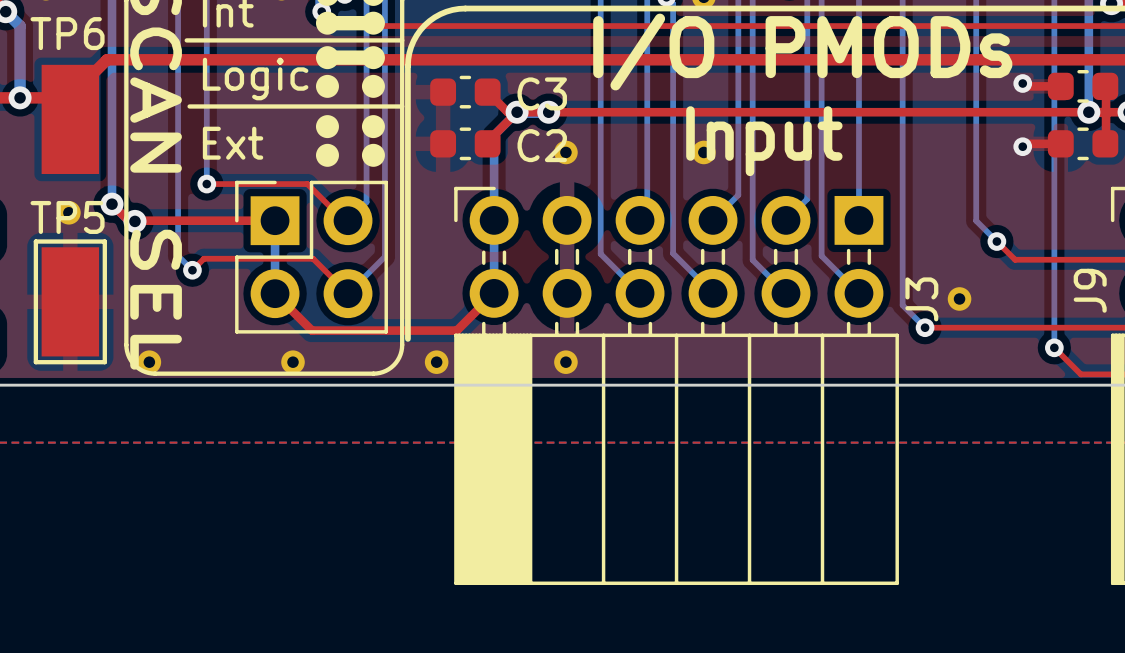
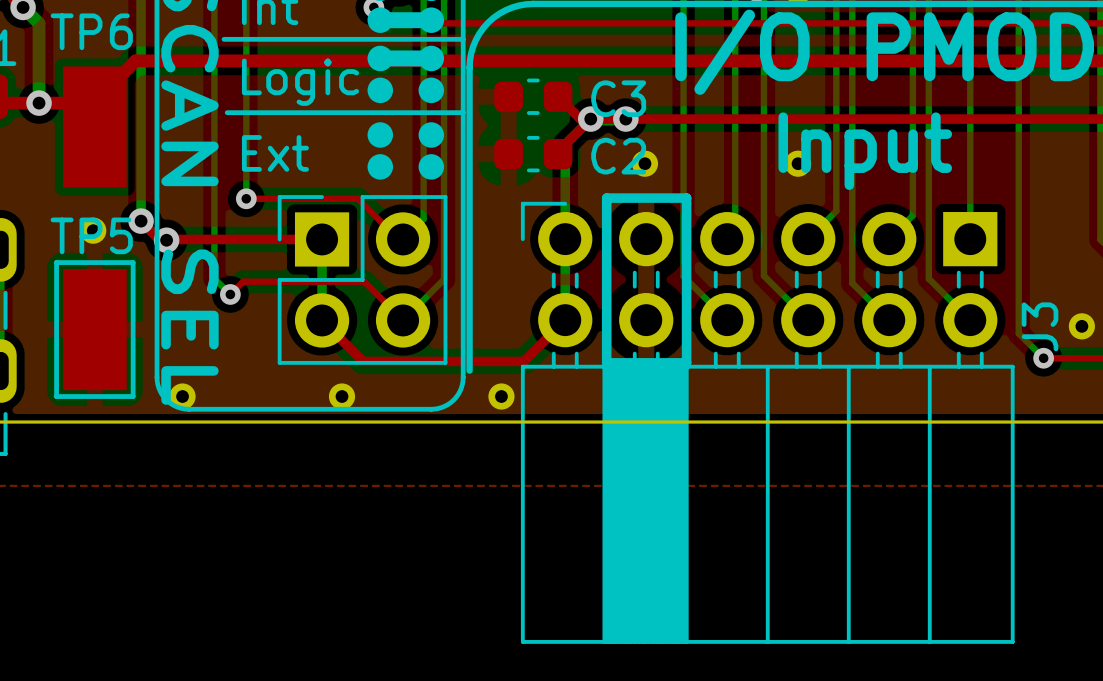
line: none -> (606, 198) (686, 198) (686, 362) (606, 362) (606, 198)
J3 footprint: [454, 186, 899, 585] -> [520, 201, 1015, 644]

